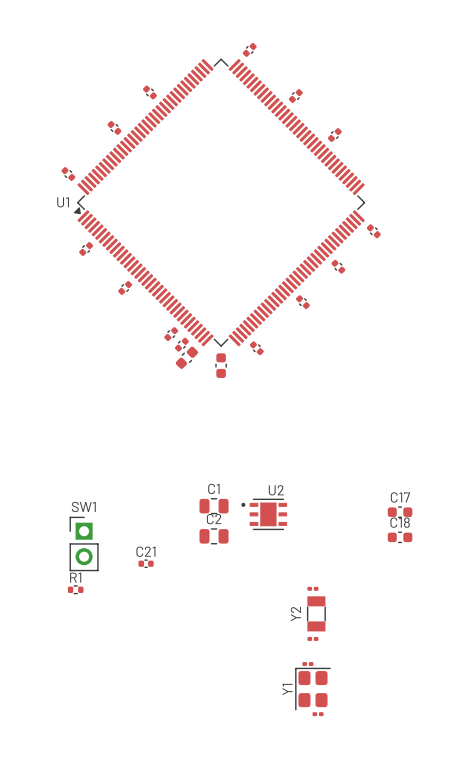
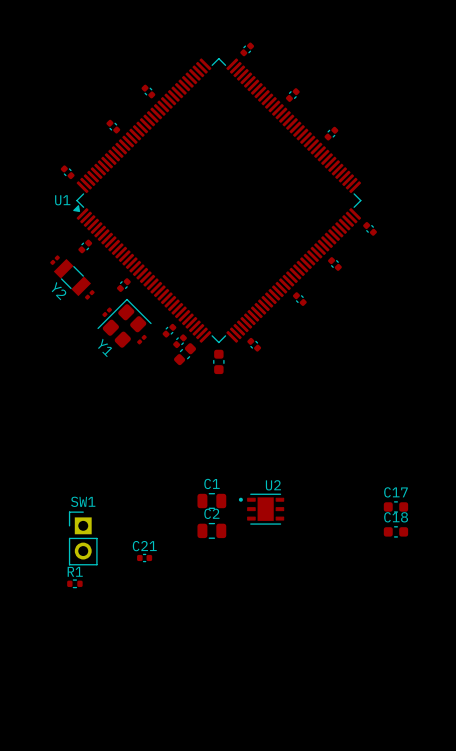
part: none -> (55, 260)
part: none -> (89, 294)
part: none -> (107, 312)
part: none -> (141, 339)
part: (312, 588) -> none
Y2 rotation: 0° (316, 613) -> 45° counterclockwise (72, 277)
Y2 position: (316, 613) -> (72, 277)
part: (312, 638) -> none
part: (307, 664) -> none
Y1 name position: Y1 (287, 689) -> Y1 (105, 347)
Y1 rotation: 0° (312, 689) -> 45° clockwise (124, 323)
Y1 position: (312, 689) -> (124, 323)
part: (318, 714) -> none

